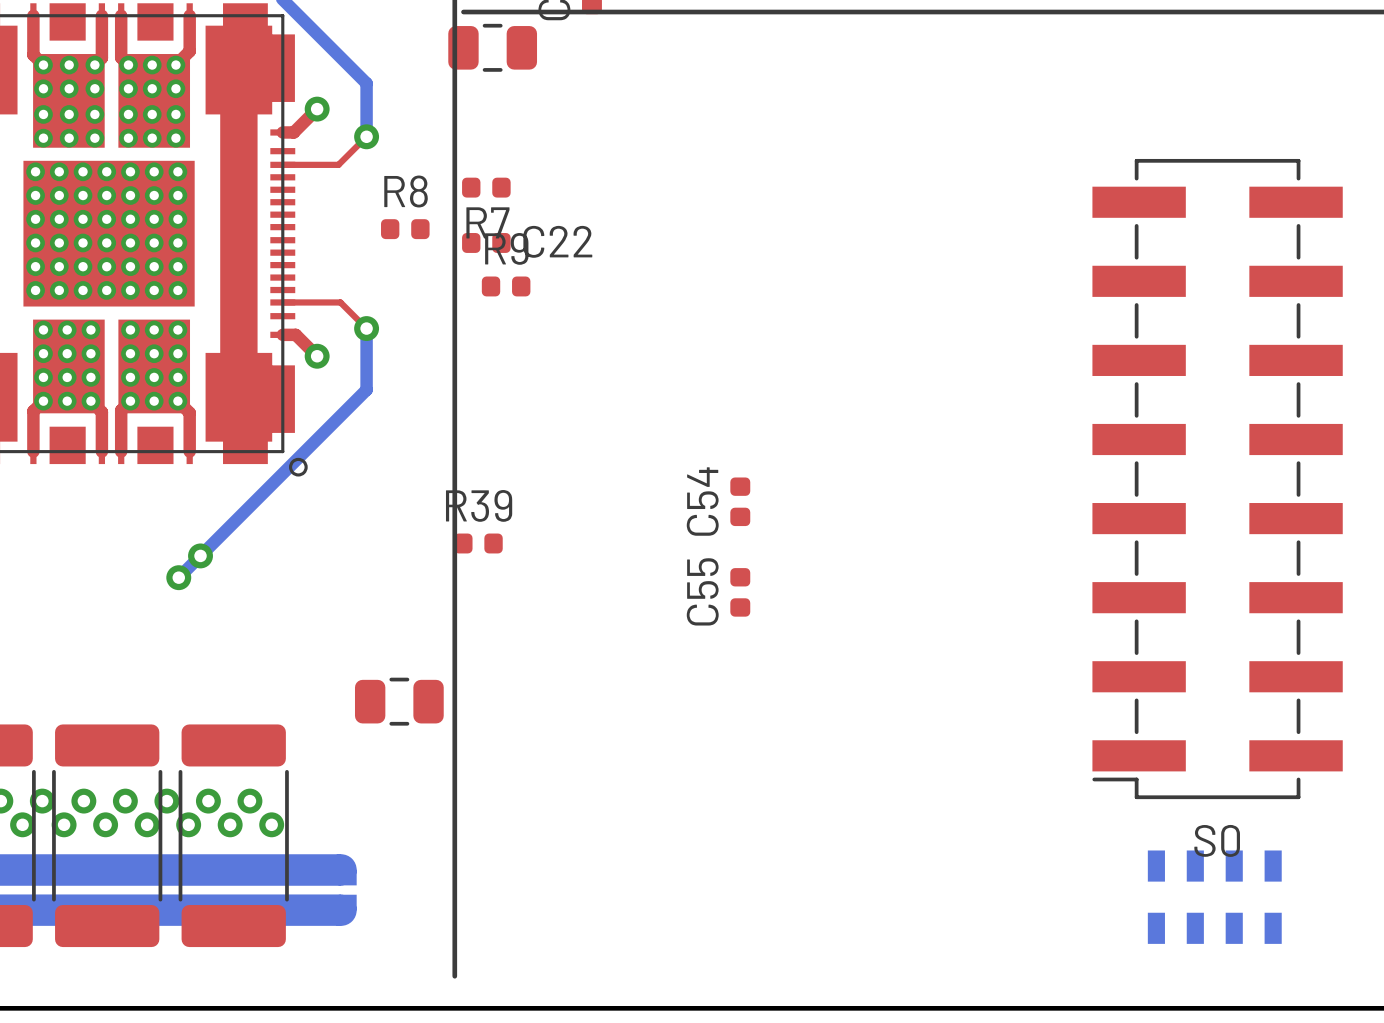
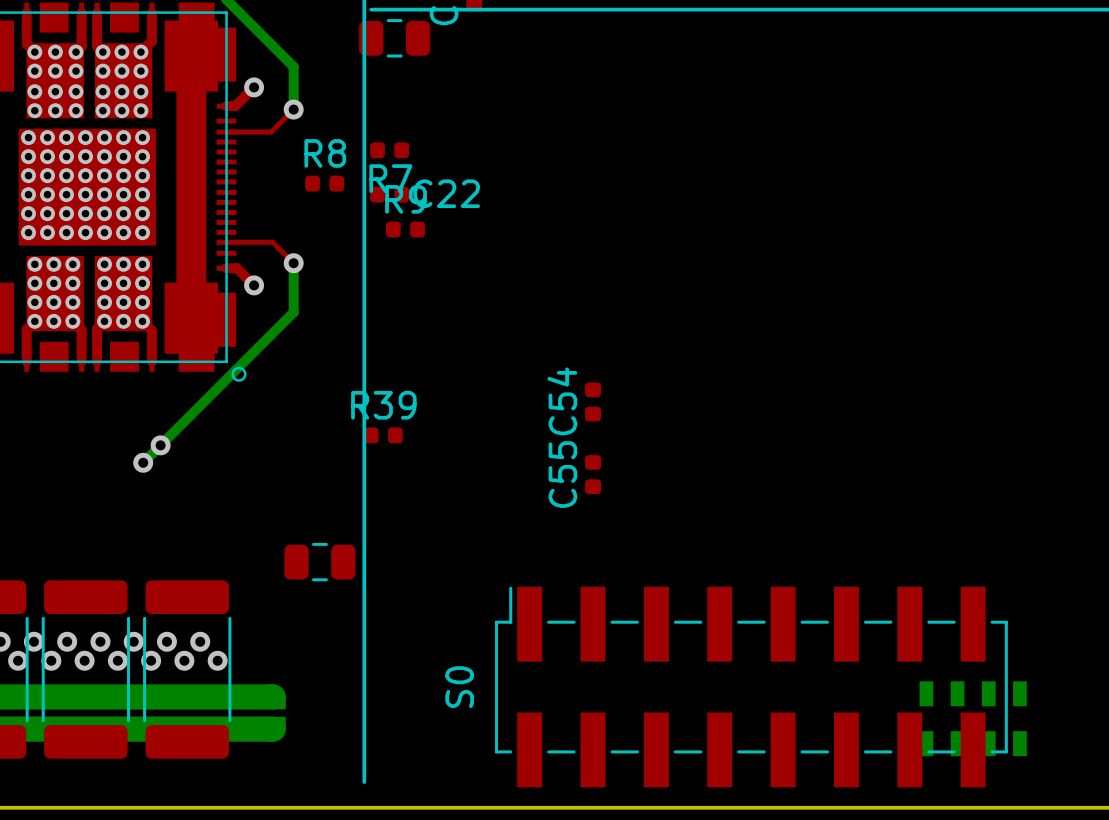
S0 rotation: 0° (1217, 479) -> 90° clockwise (751, 687)
S0 position: (1217, 479) -> (751, 687)

